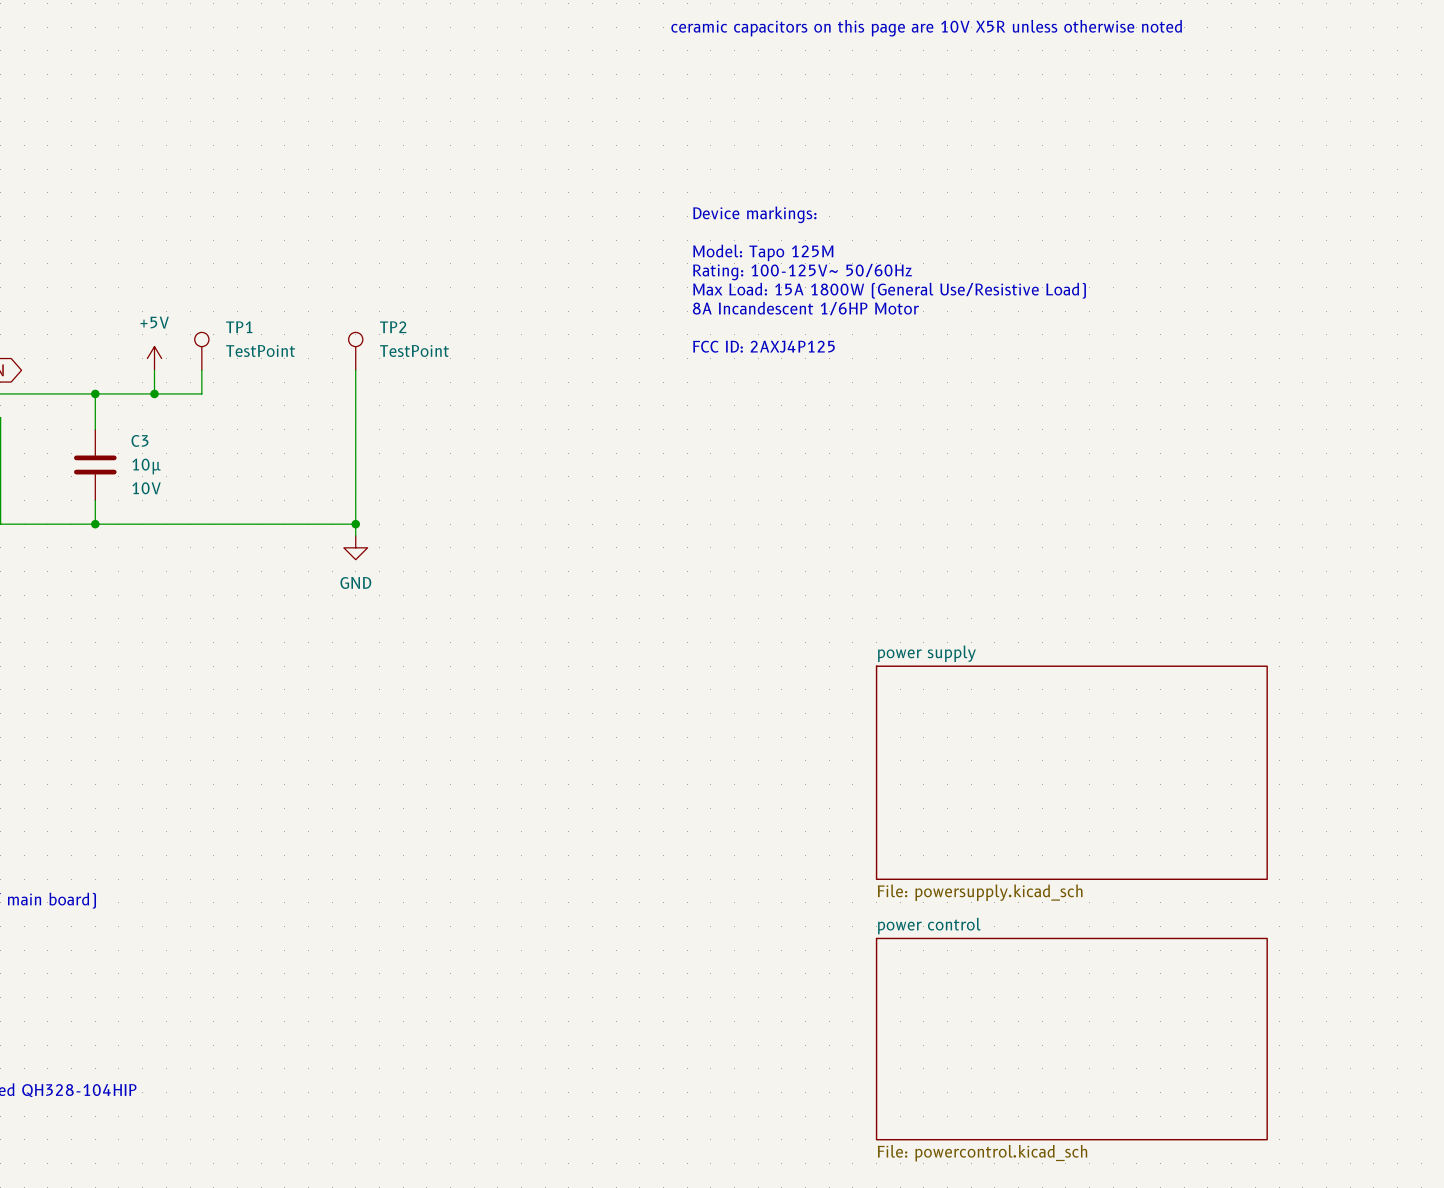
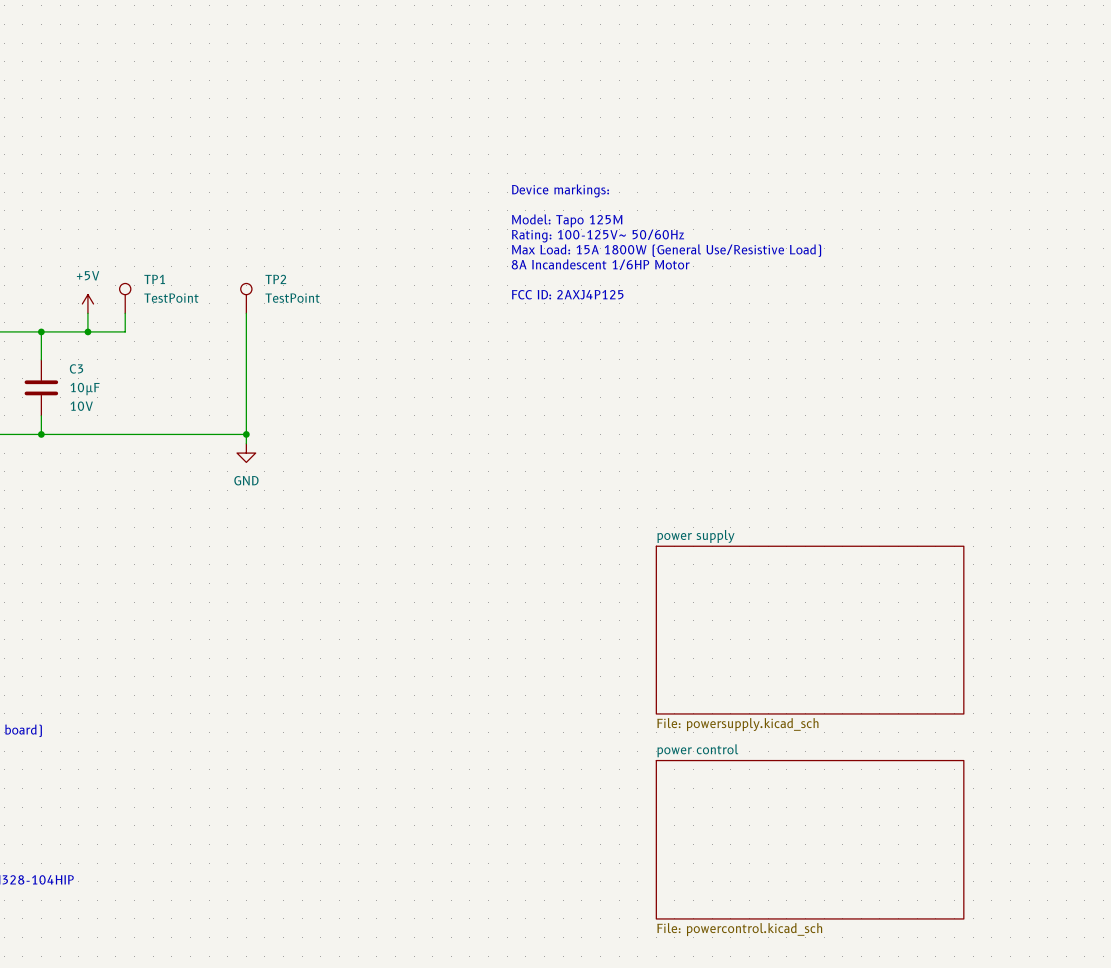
text: ceramic capacitors on this page are 10V X5R unless otherwise noted (926, 28) -> none
C3 value: 10µ (146, 466) -> 10µF (85, 389)

